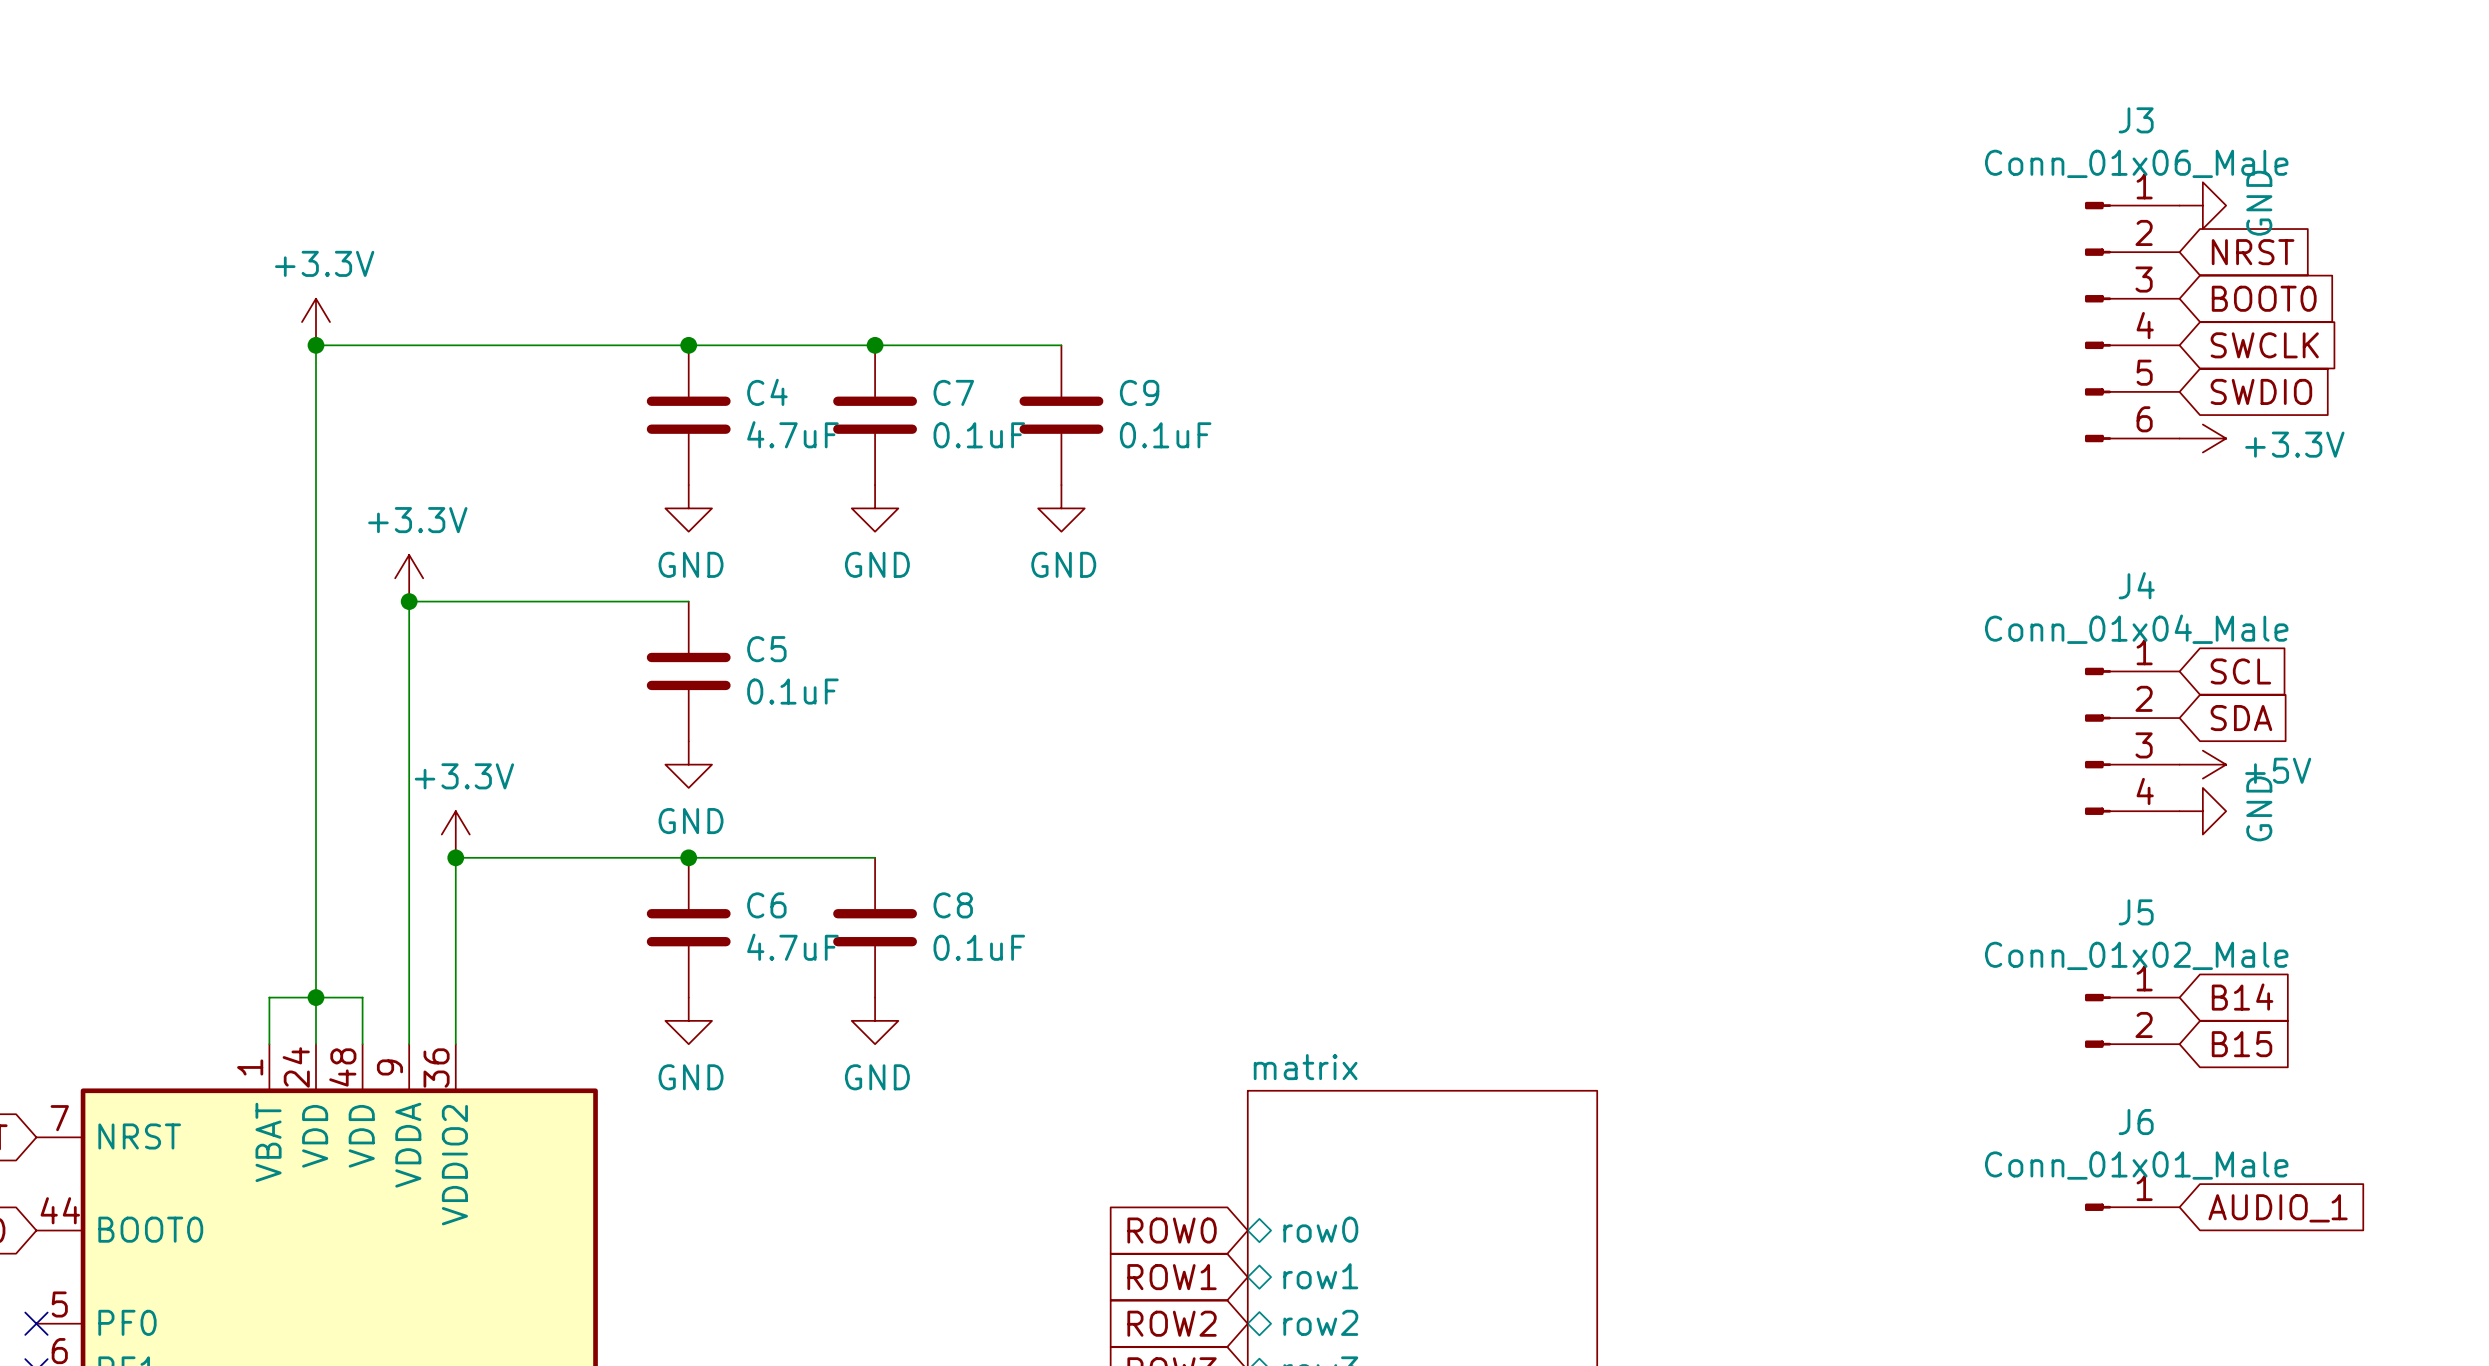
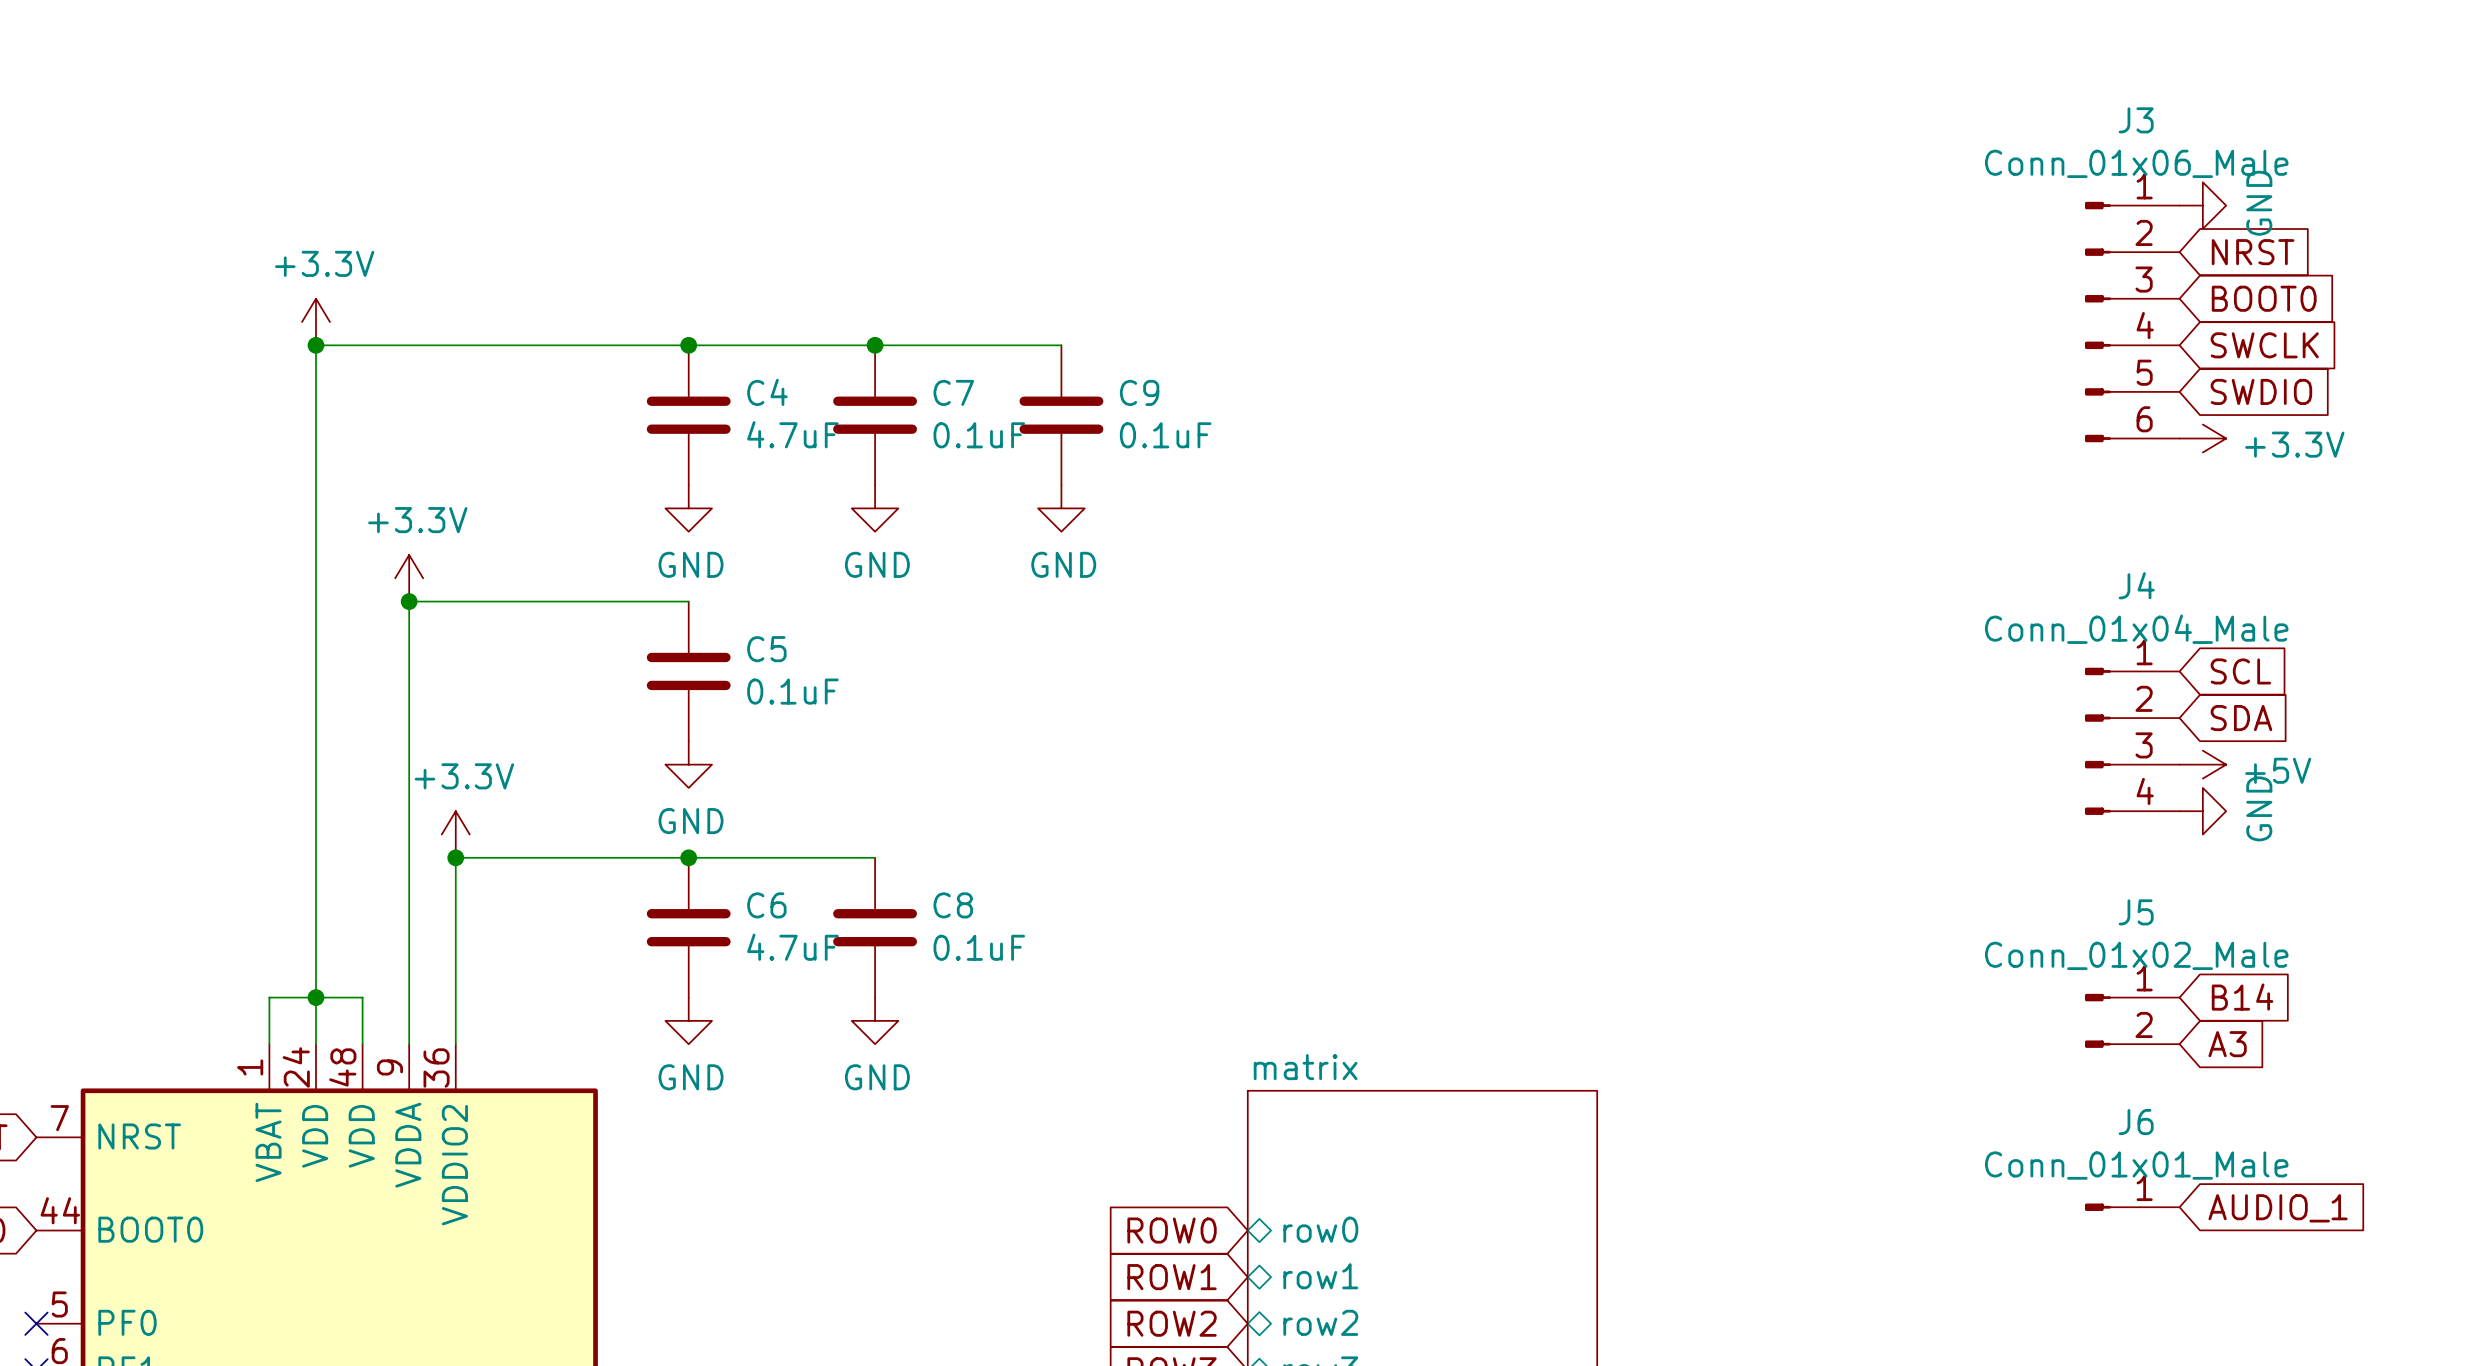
global label: B15 (2242, 1044) -> A3 (2227, 1044)

